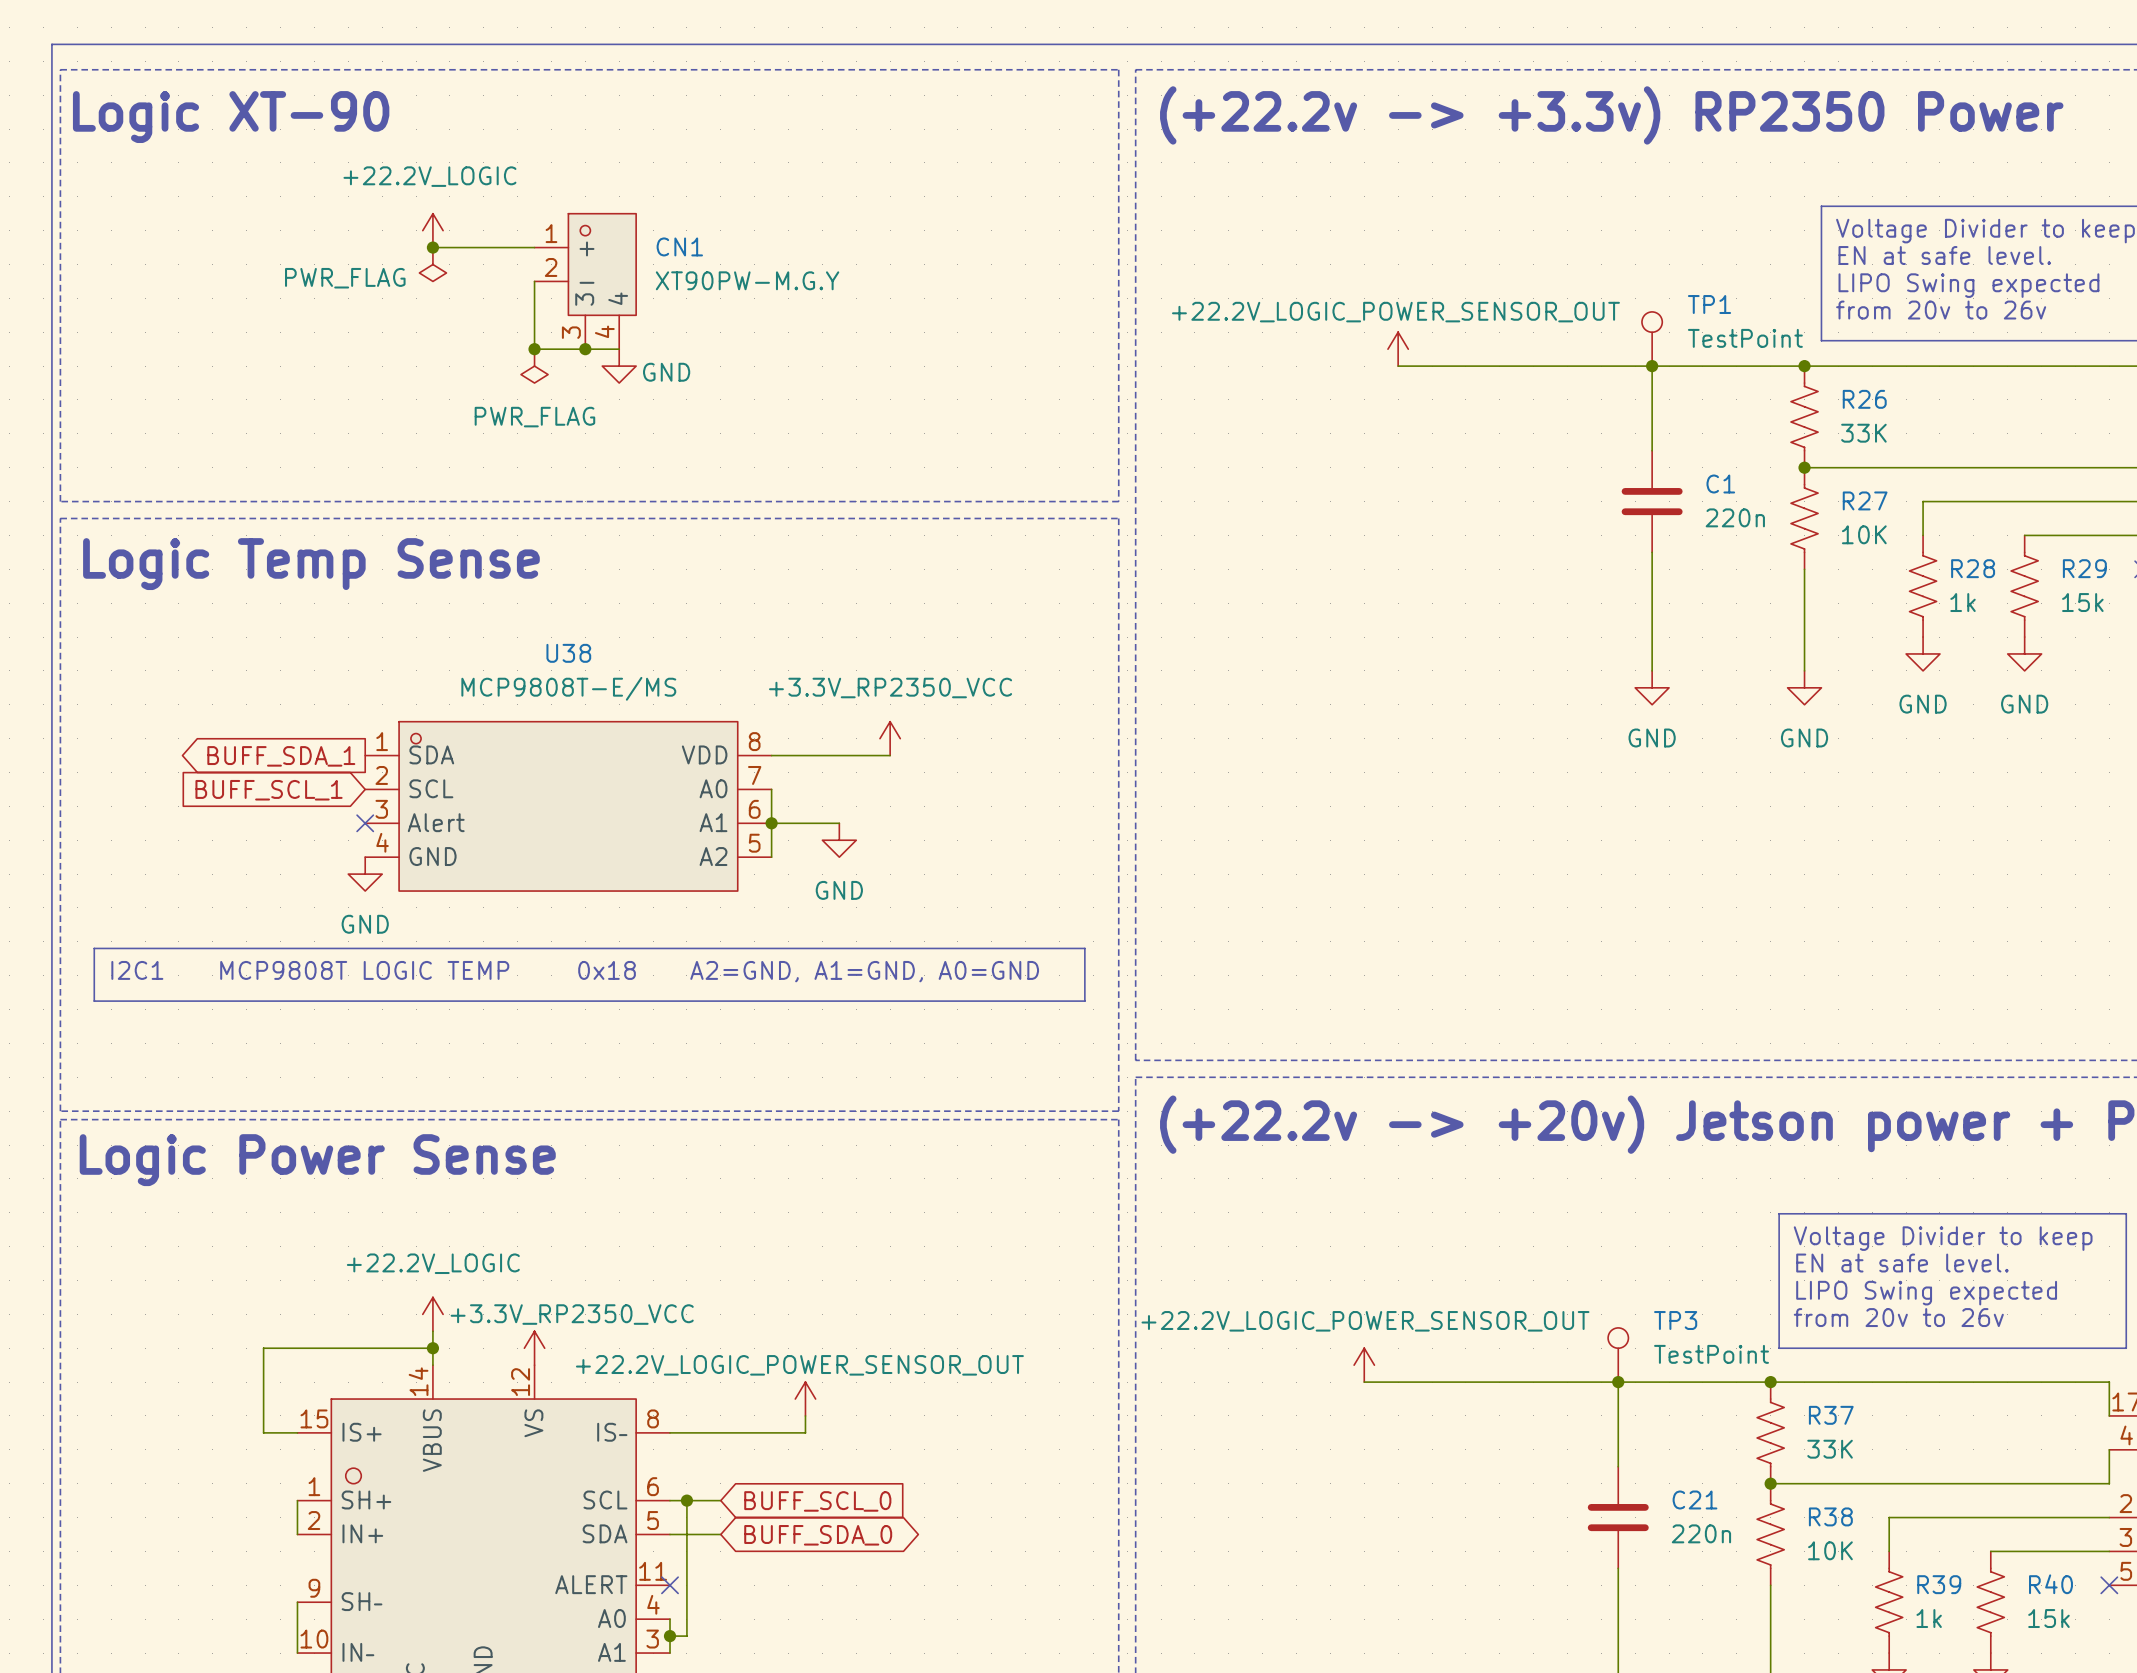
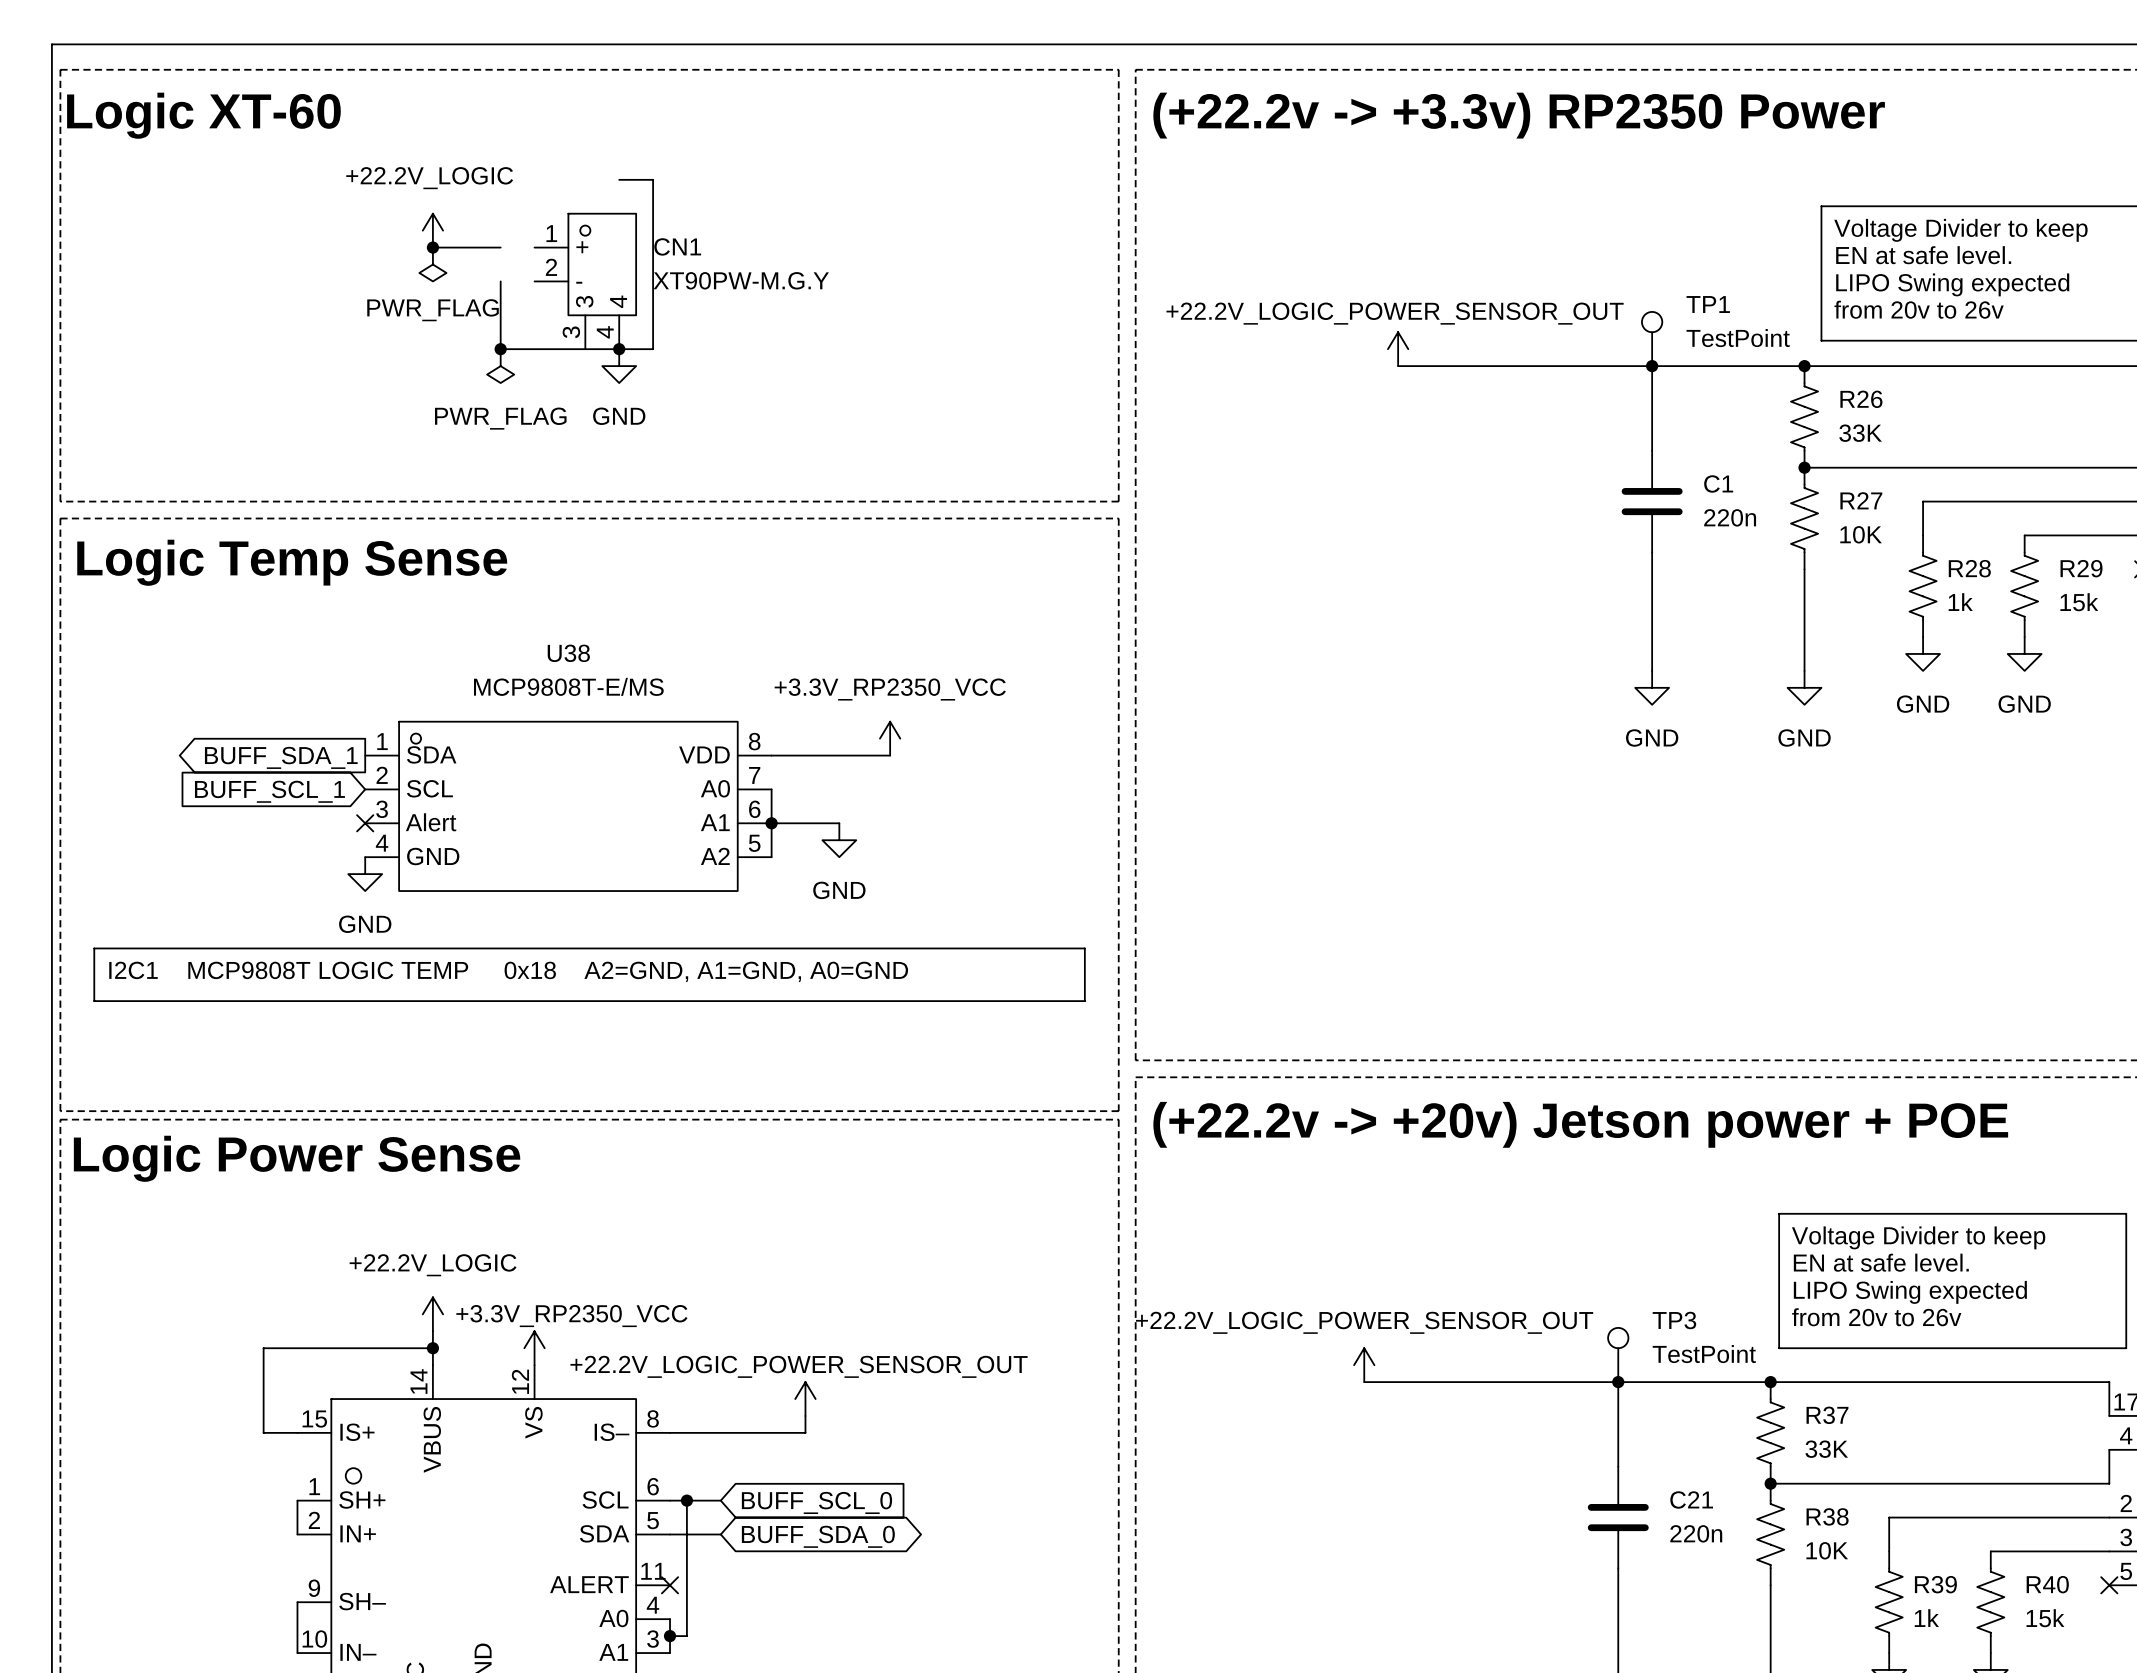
text: Logic XT-90 (231, 117) -> Logic XT-60 (203, 115)
wire: none -> (619, 179) (653, 179) (653, 349) (619, 349)
wire: (500, 247) (534, 247) -> none
power symbol text position: PWR_FLAG (345, 278) -> PWR_FLAG (433, 310)
wire: (534, 281) (534, 349) -> (500, 281) (500, 349) (534, 349)
junction position: (534, 349) -> (500, 349)
junction position: (585, 349) -> (619, 349)
power symbol position: PWR_FLAG (534, 366) -> PWR_FLAG (500, 366)
power symbol text position: GND (666, 372) -> GND (619, 416)

